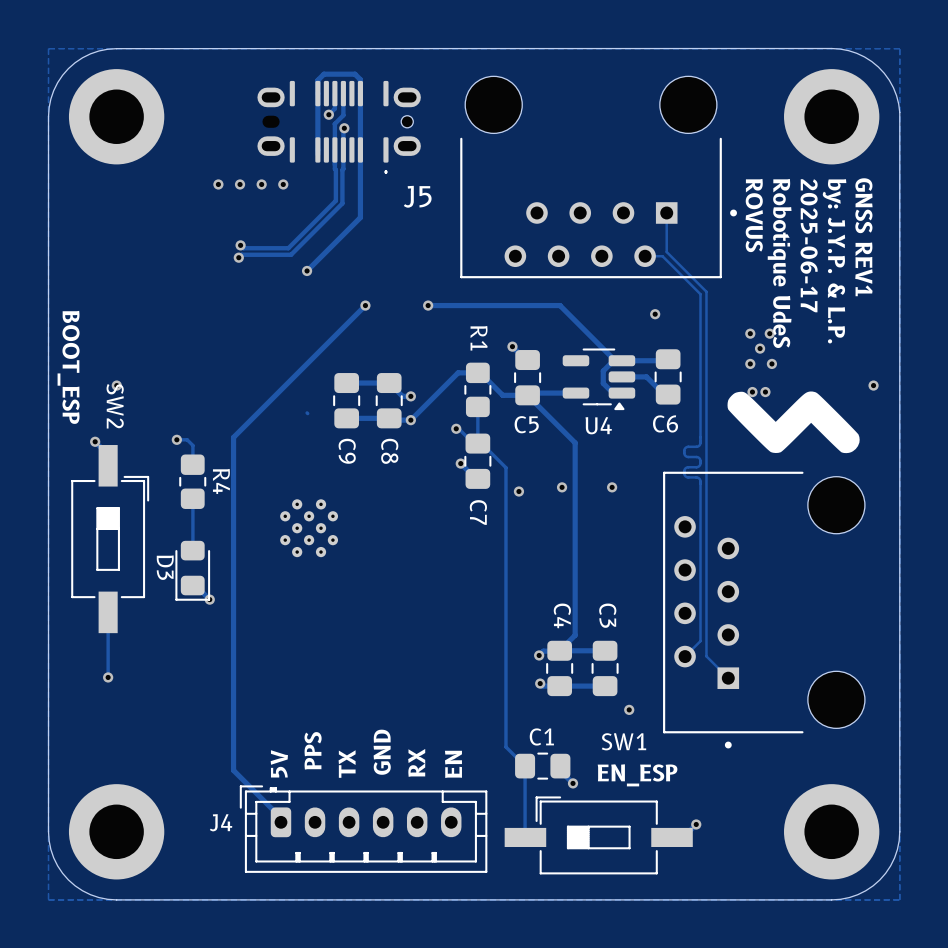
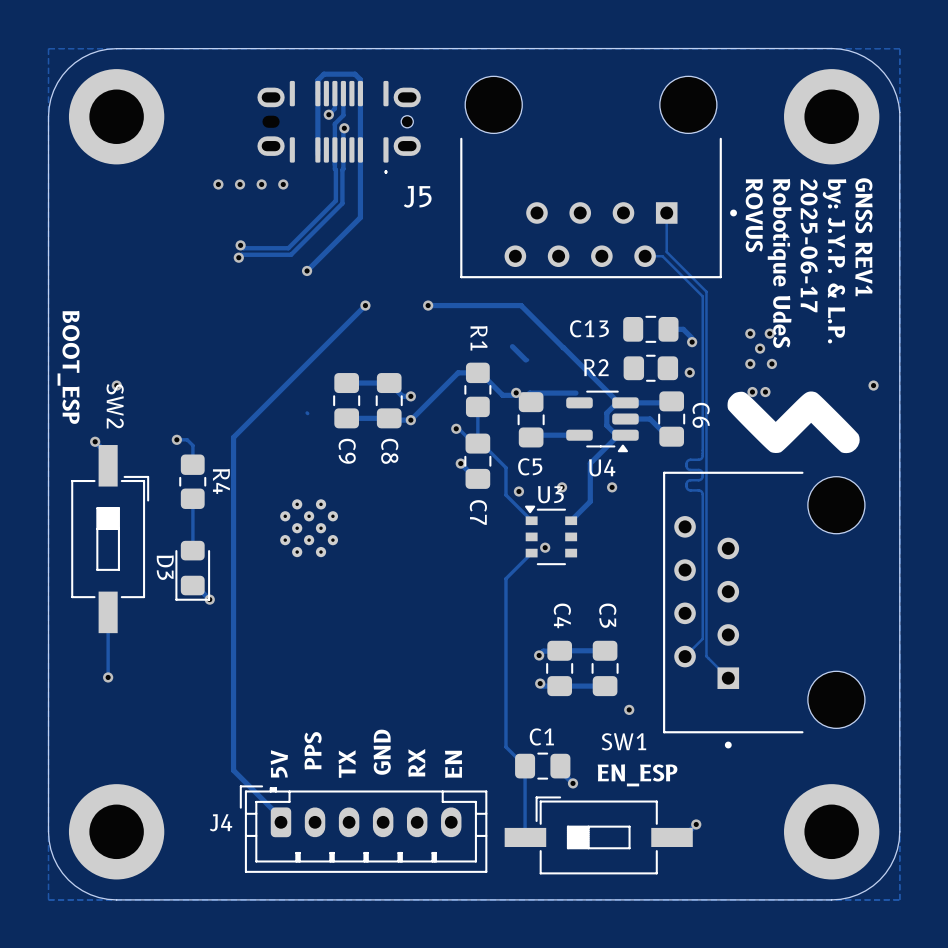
track: (700, 294) (700, 443) (697, 446) (686, 447) (684, 450) (686, 456) (698, 457) (700, 463) (697, 467) (686, 467) (684, 471) (686, 476) (697, 477) (700, 481) (700, 641) -> (700, 294) (702, 296) (702, 456) (700, 459) (688, 460) (686, 465) (689, 469) (700, 470) (702, 476) (700, 479) (688, 480) (686, 484) (688, 489) (700, 490) (702, 494) (702, 638) (700, 641)
track: (521, 305) (560, 305) (615, 360) -> (521, 305) (563, 347)
via: (655, 314) -> none
C13: none -> (650, 329)
track: none -> (668, 329) (683, 329) (691, 337)
via: none -> (692, 342)
via position: (512, 346) -> (516, 392)
track: none -> (563, 347) (618, 402)
track: (668, 359) (613, 360) (603, 371) (603, 383) (612, 393) (621, 393) -> none
R2: none -> (650, 368)
via: none -> (689, 372)
track: (621, 376) (646, 376) (664, 394) -> (625, 419) (650, 419) (667, 436)
C6 position: (668, 376) -> (671, 419)
C5 position: (527, 377) -> (531, 419)
U4 position: (598, 379) -> (602, 421)
track: (527, 395) (575, 442) (575, 635) (559, 650) -> none
track: none -> (617, 402) (606, 413) (606, 425) (616, 435)
track: none -> (670, 402) (625, 402)
C6 name rotation: 0° (665, 423) -> 90° clockwise (701, 415)
track: none -> (579, 435) (533, 435)
track: none -> (624, 436) (617, 436) (590, 463) (590, 501) (571, 520)
track: (505, 495) (505, 578) -> (505, 495) (531, 520)
U3: none -> (551, 535)
via: none -> (545, 547)
track: none -> (531, 553) (505, 578)

